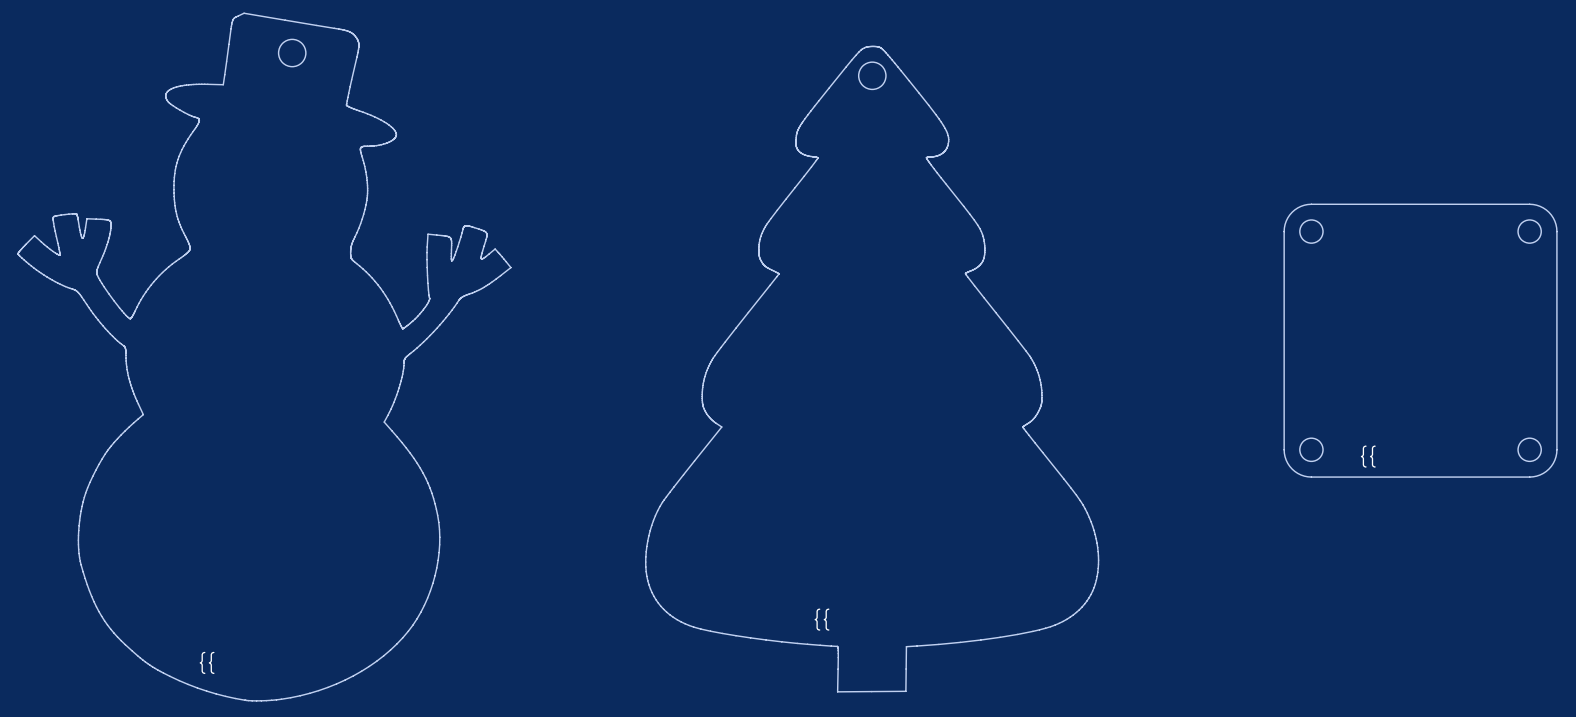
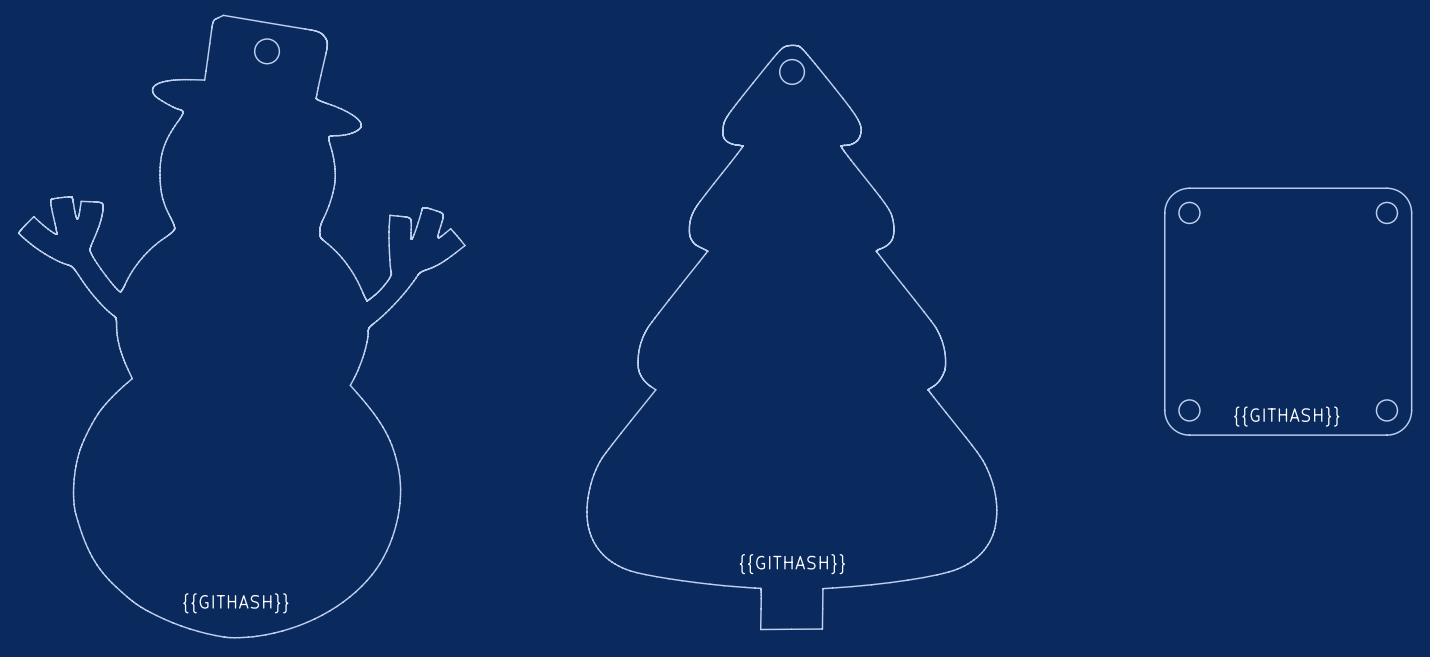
text: {{ (1368, 456) -> {{GITHASH}} (1286, 416)
text: {{ (821, 619) -> {{GITHASH}} (792, 564)
text: {{ (207, 662) -> {{GITHASH}} (235, 603)

